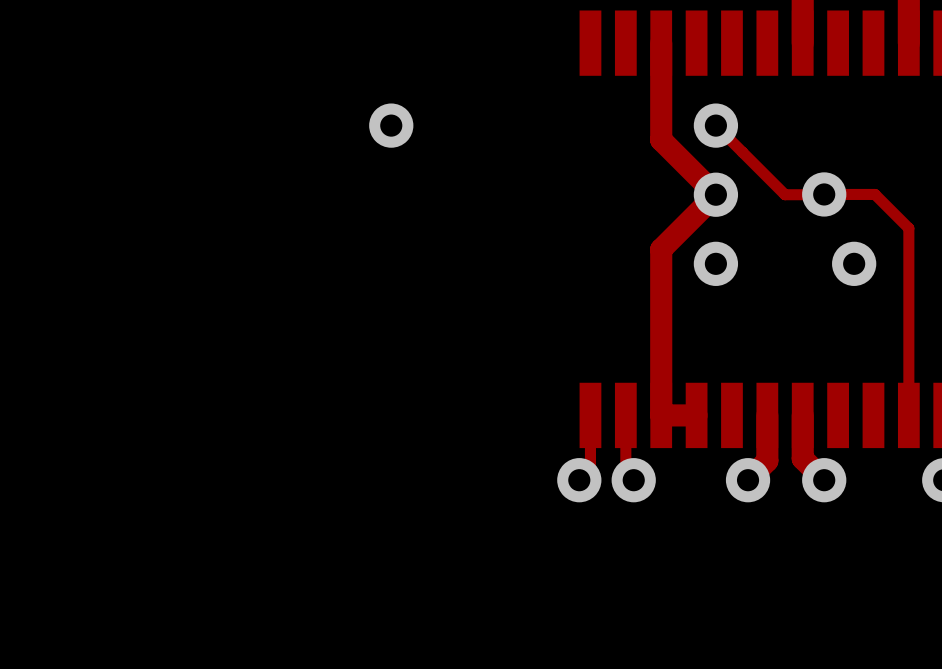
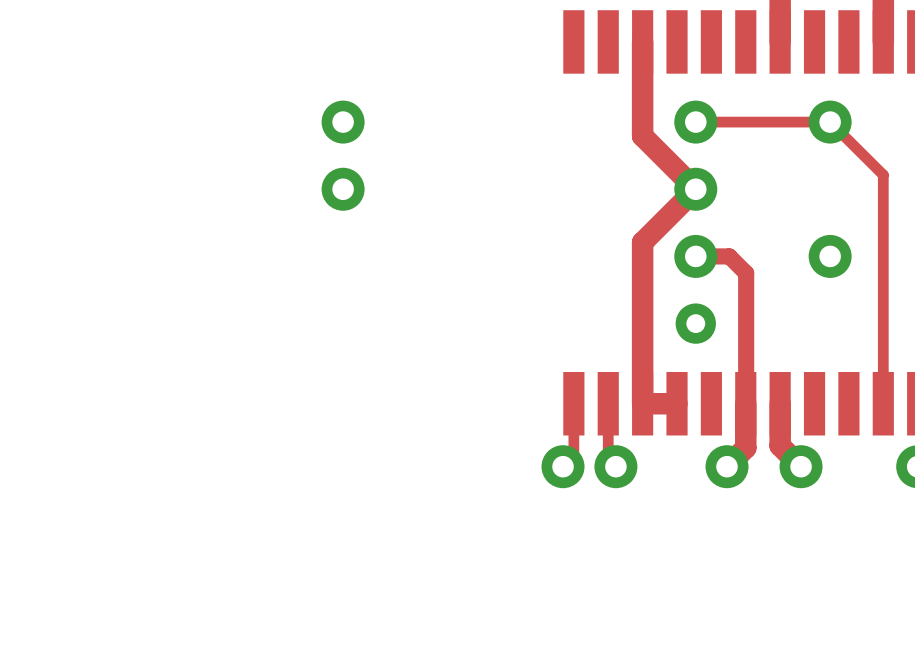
via position: (391, 125) -> (343, 122)
track: (715, 125) (785, 194) (874, 194) (908, 228) -> (695, 122) (830, 122) (883, 174) (883, 221)
via: none -> (343, 189)
via position: (824, 194) -> (830, 122)
track: none -> (695, 256) (729, 256) (746, 273) (746, 440)
via: none -> (695, 323)

